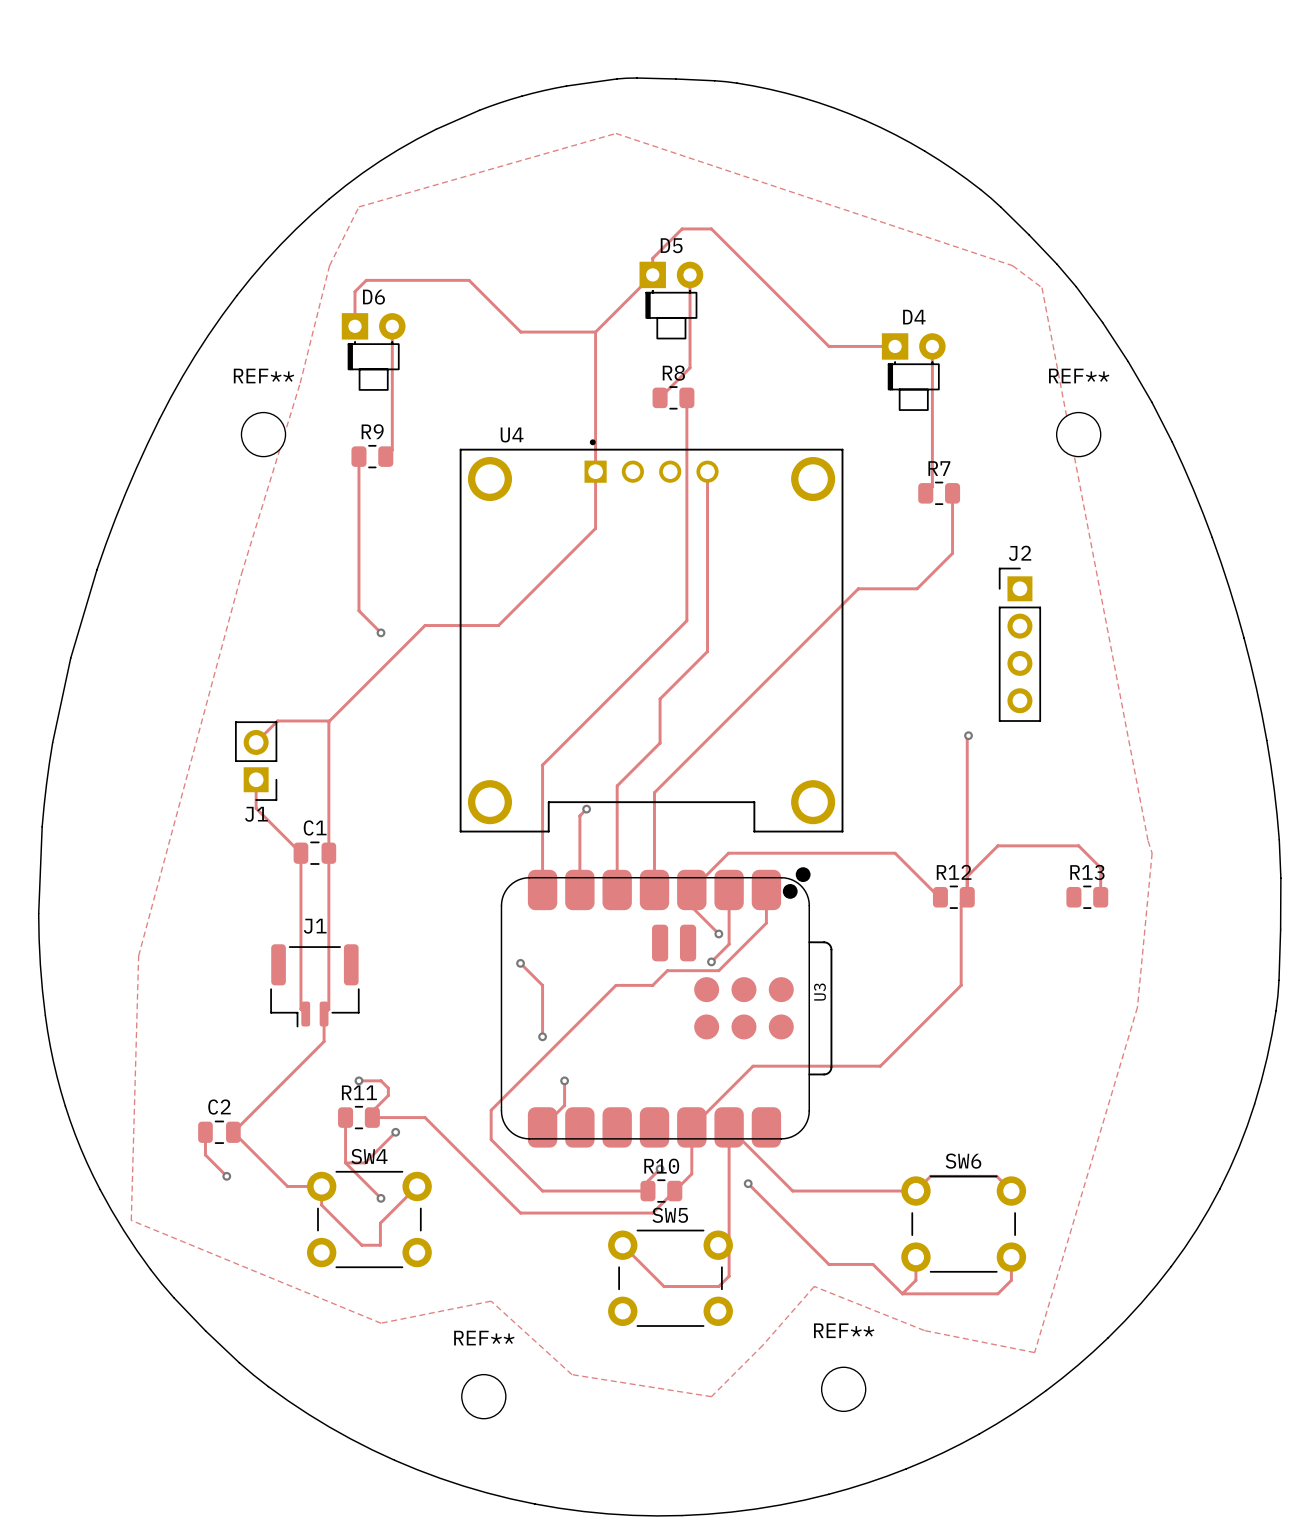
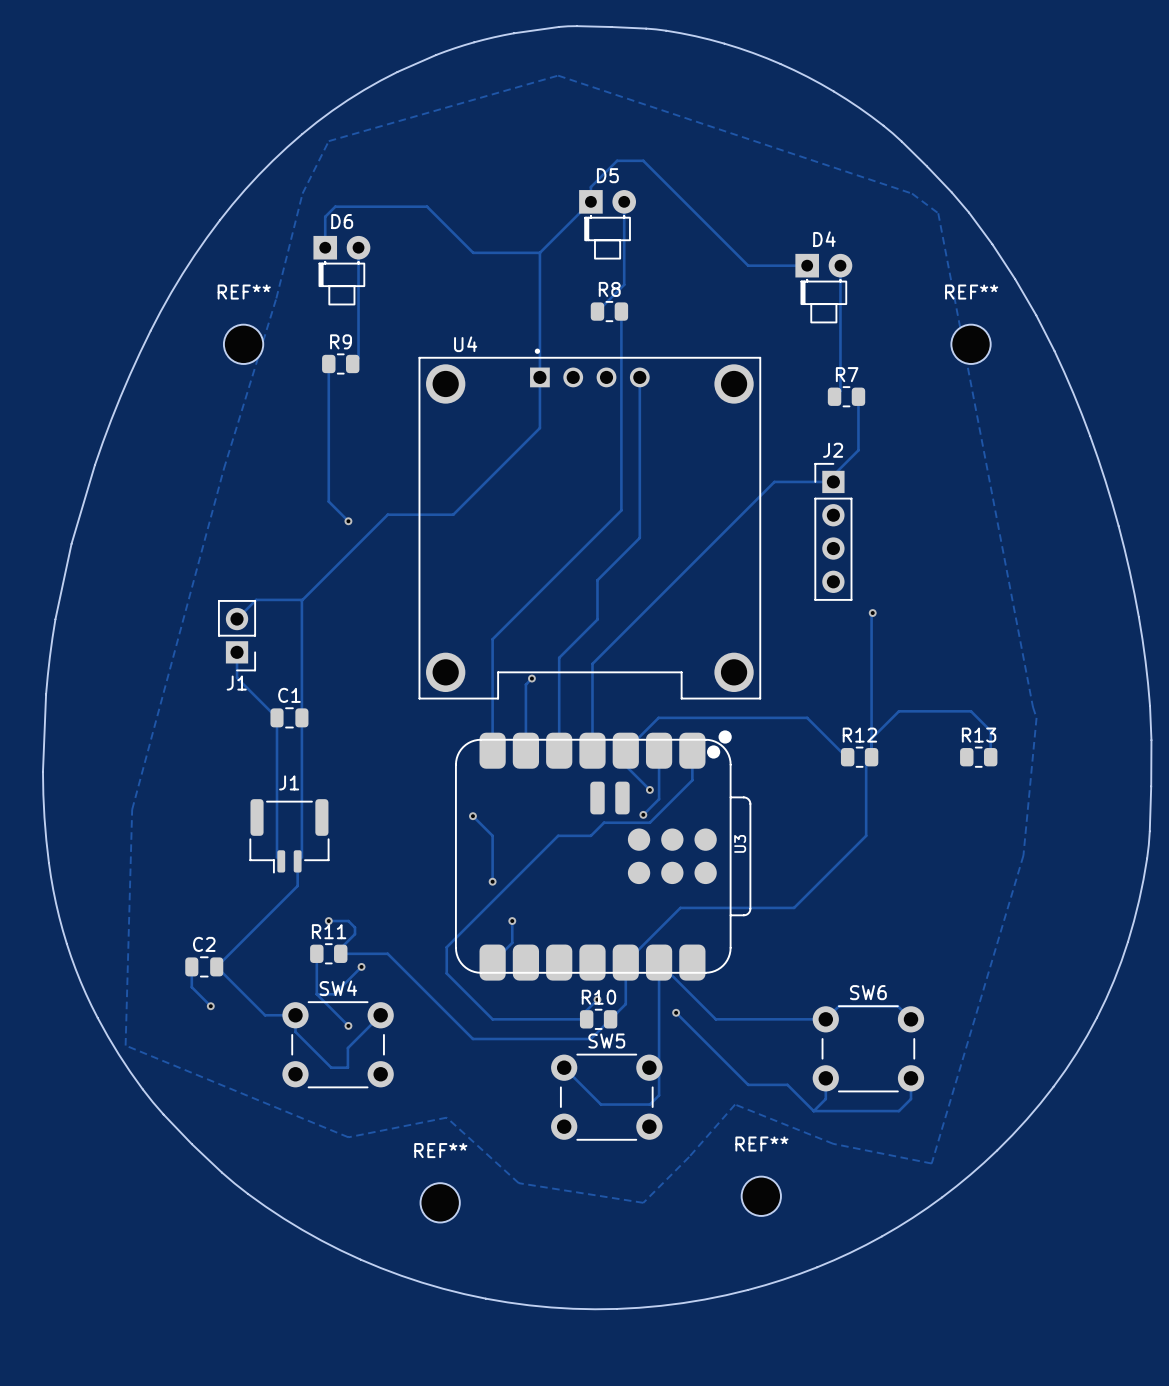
J2 position: (1019, 644) -> (833, 531)

